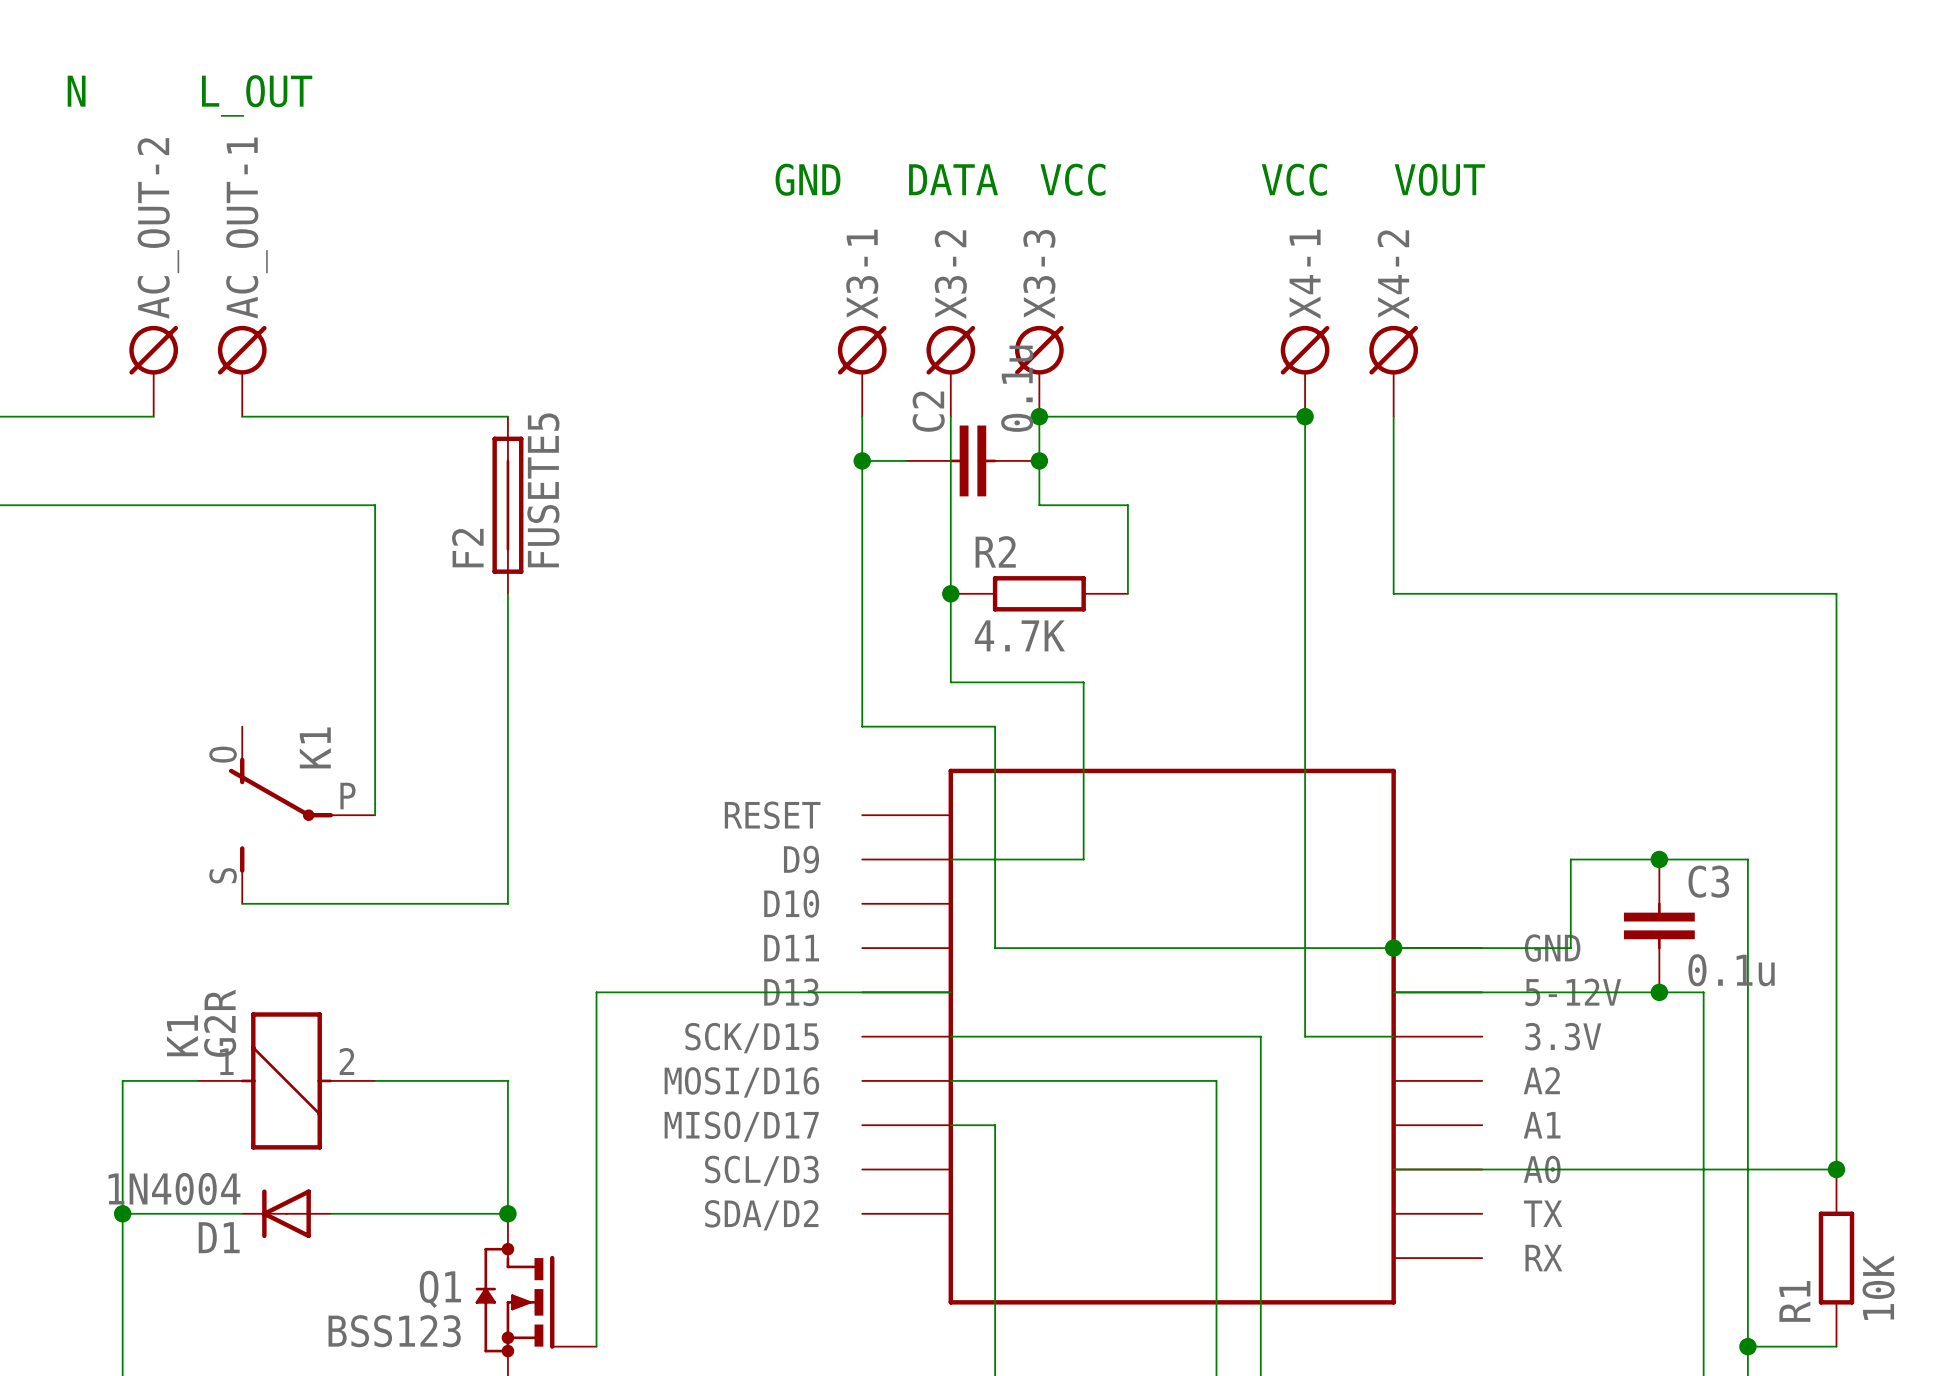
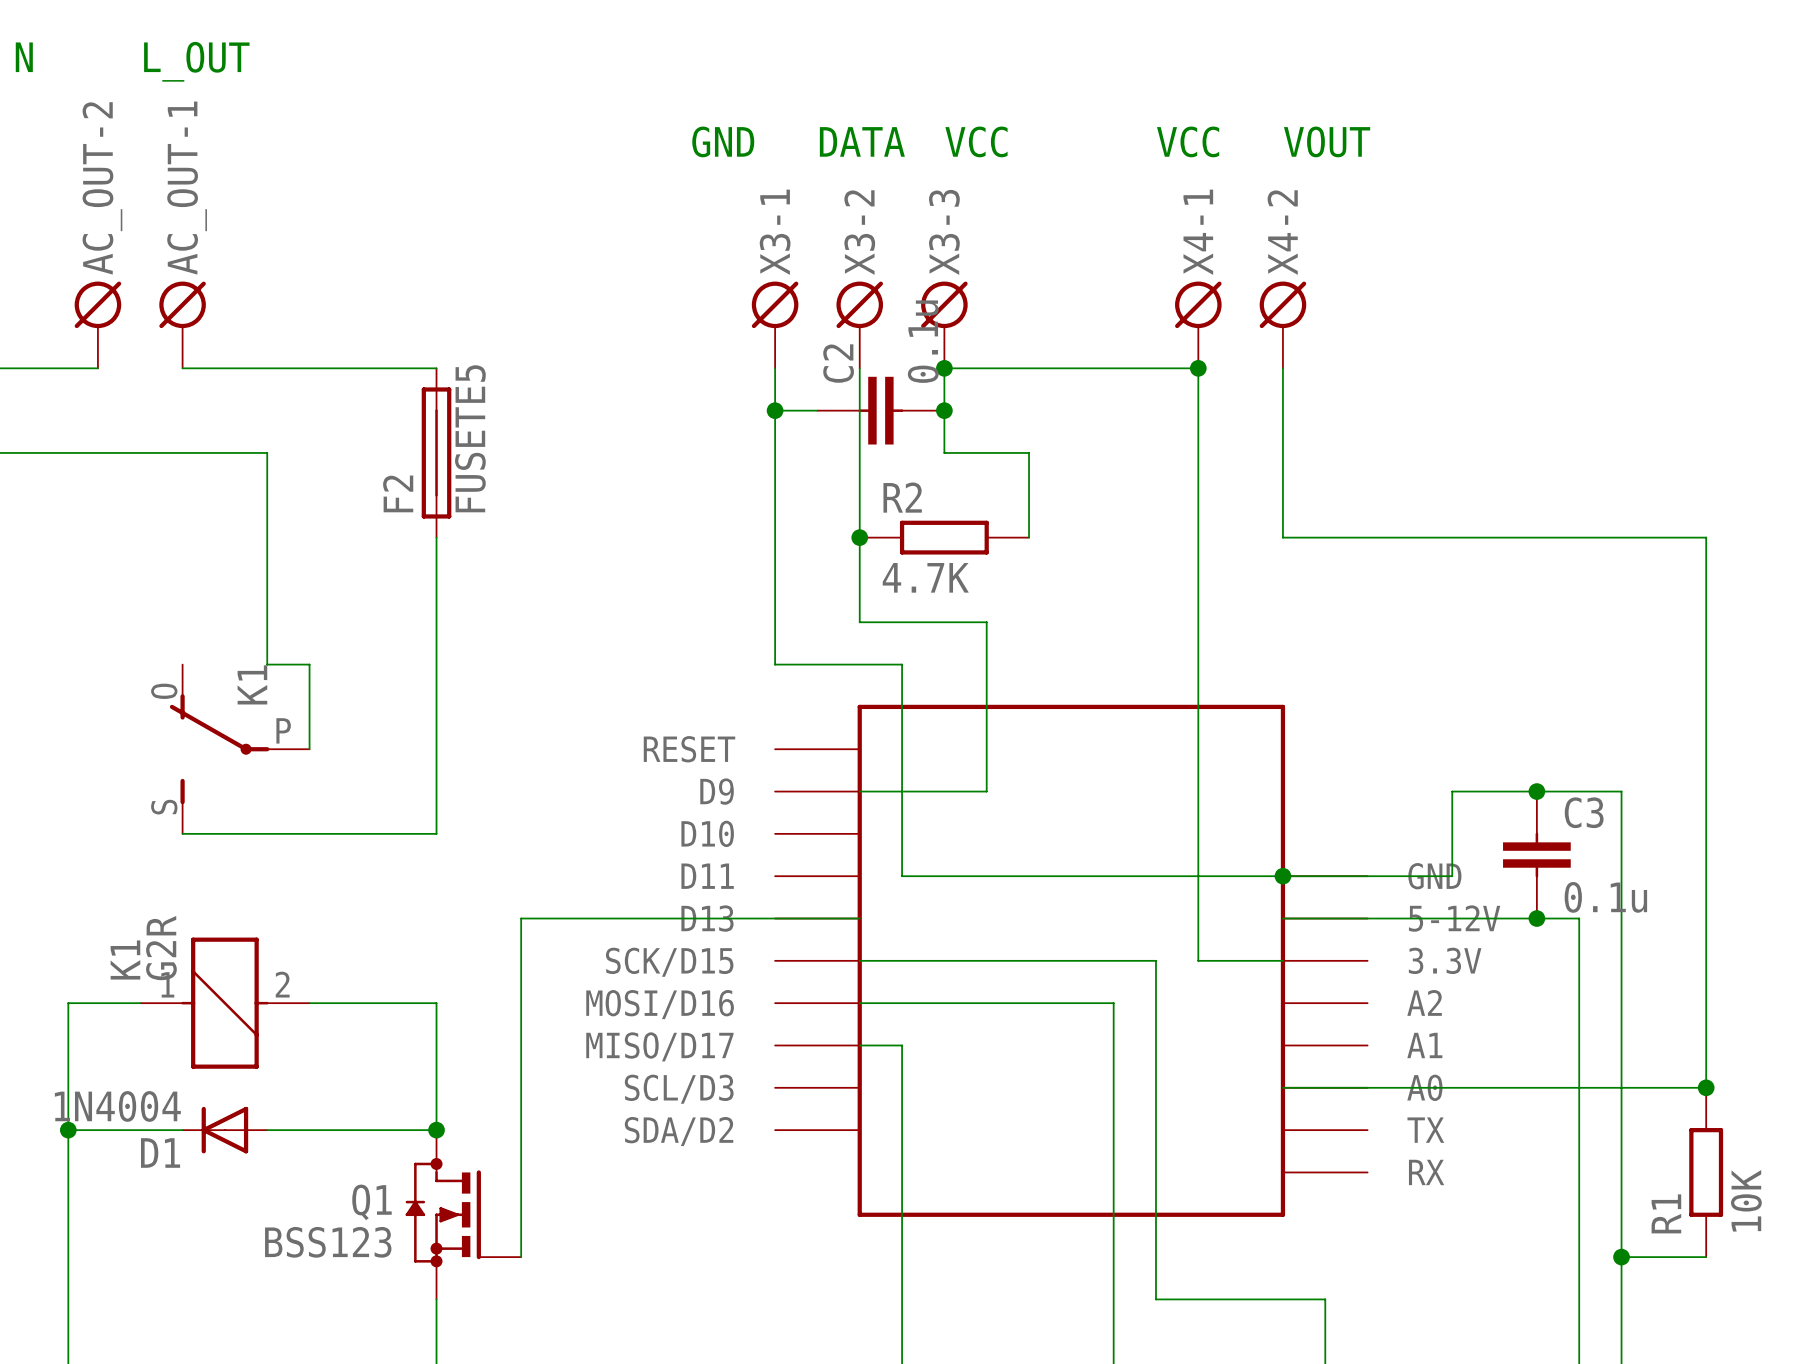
wire: (330, 505) (375, 505) (375, 726) -> (267, 452) (267, 664) (309, 664)

